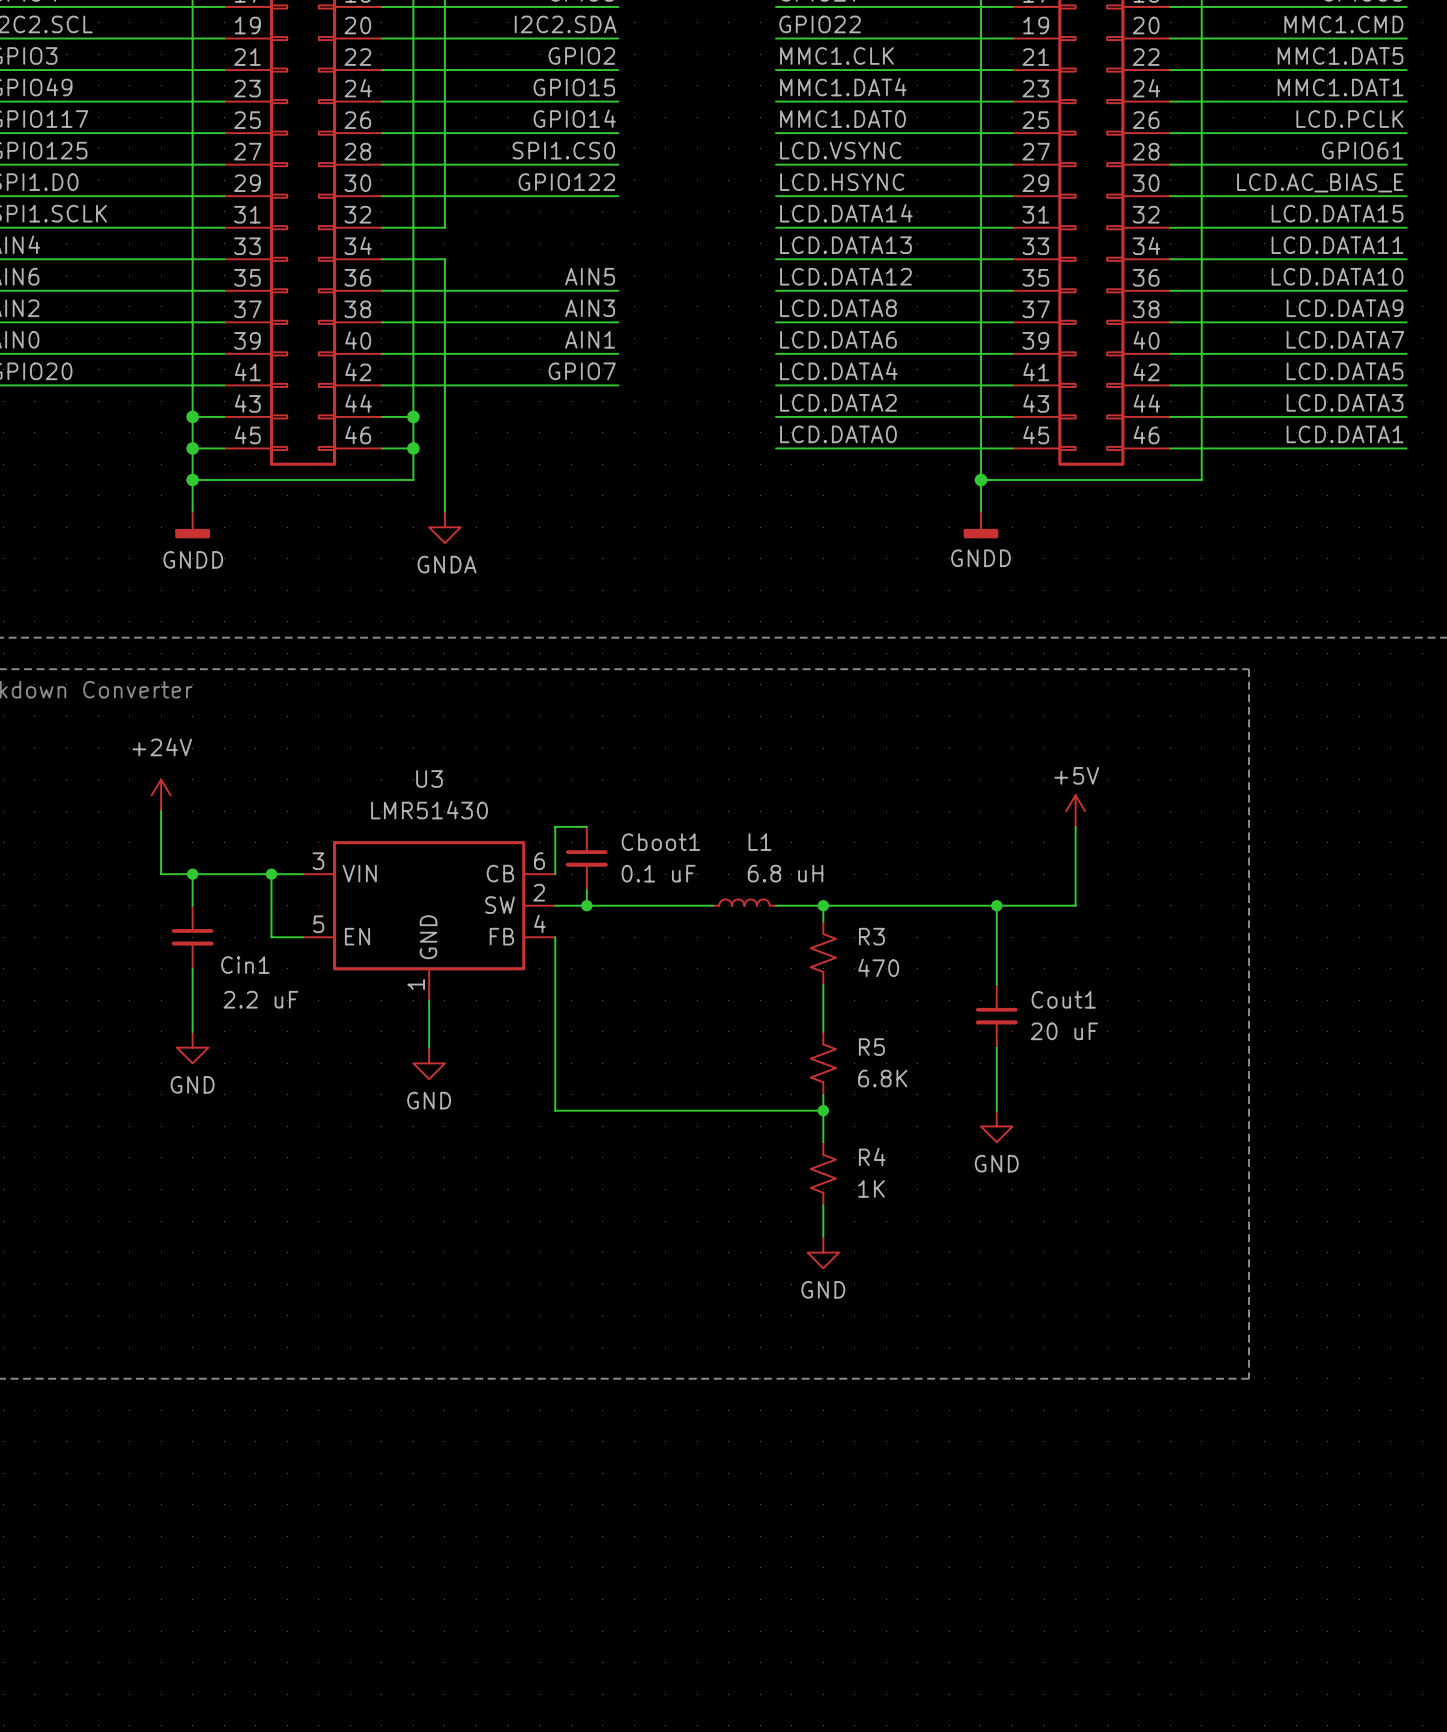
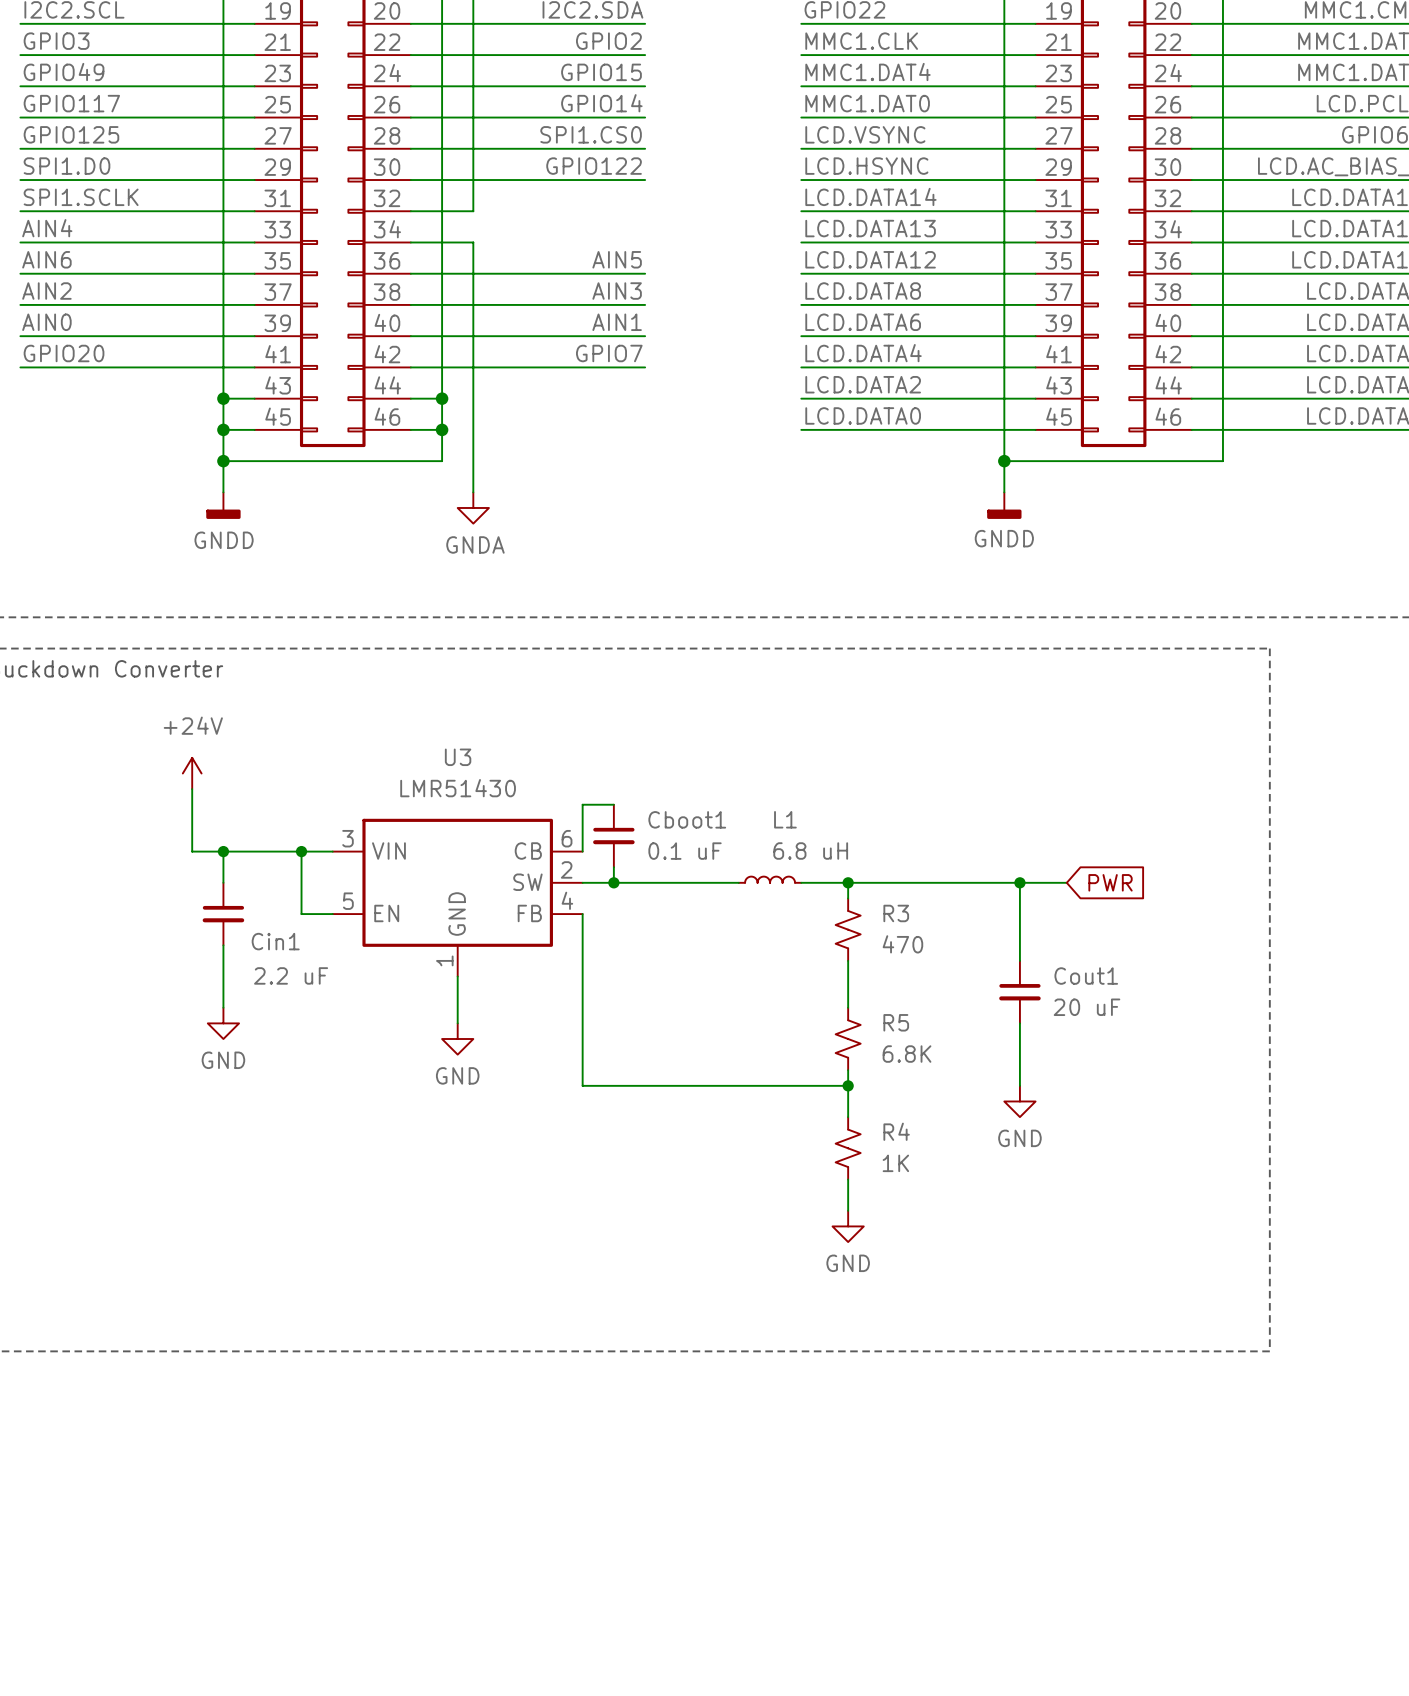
power symbol: +5V (1075, 811) -> none
wire: (1075, 826) (1075, 905) (1044, 905) -> none
global label: none -> PWR (1110, 882)

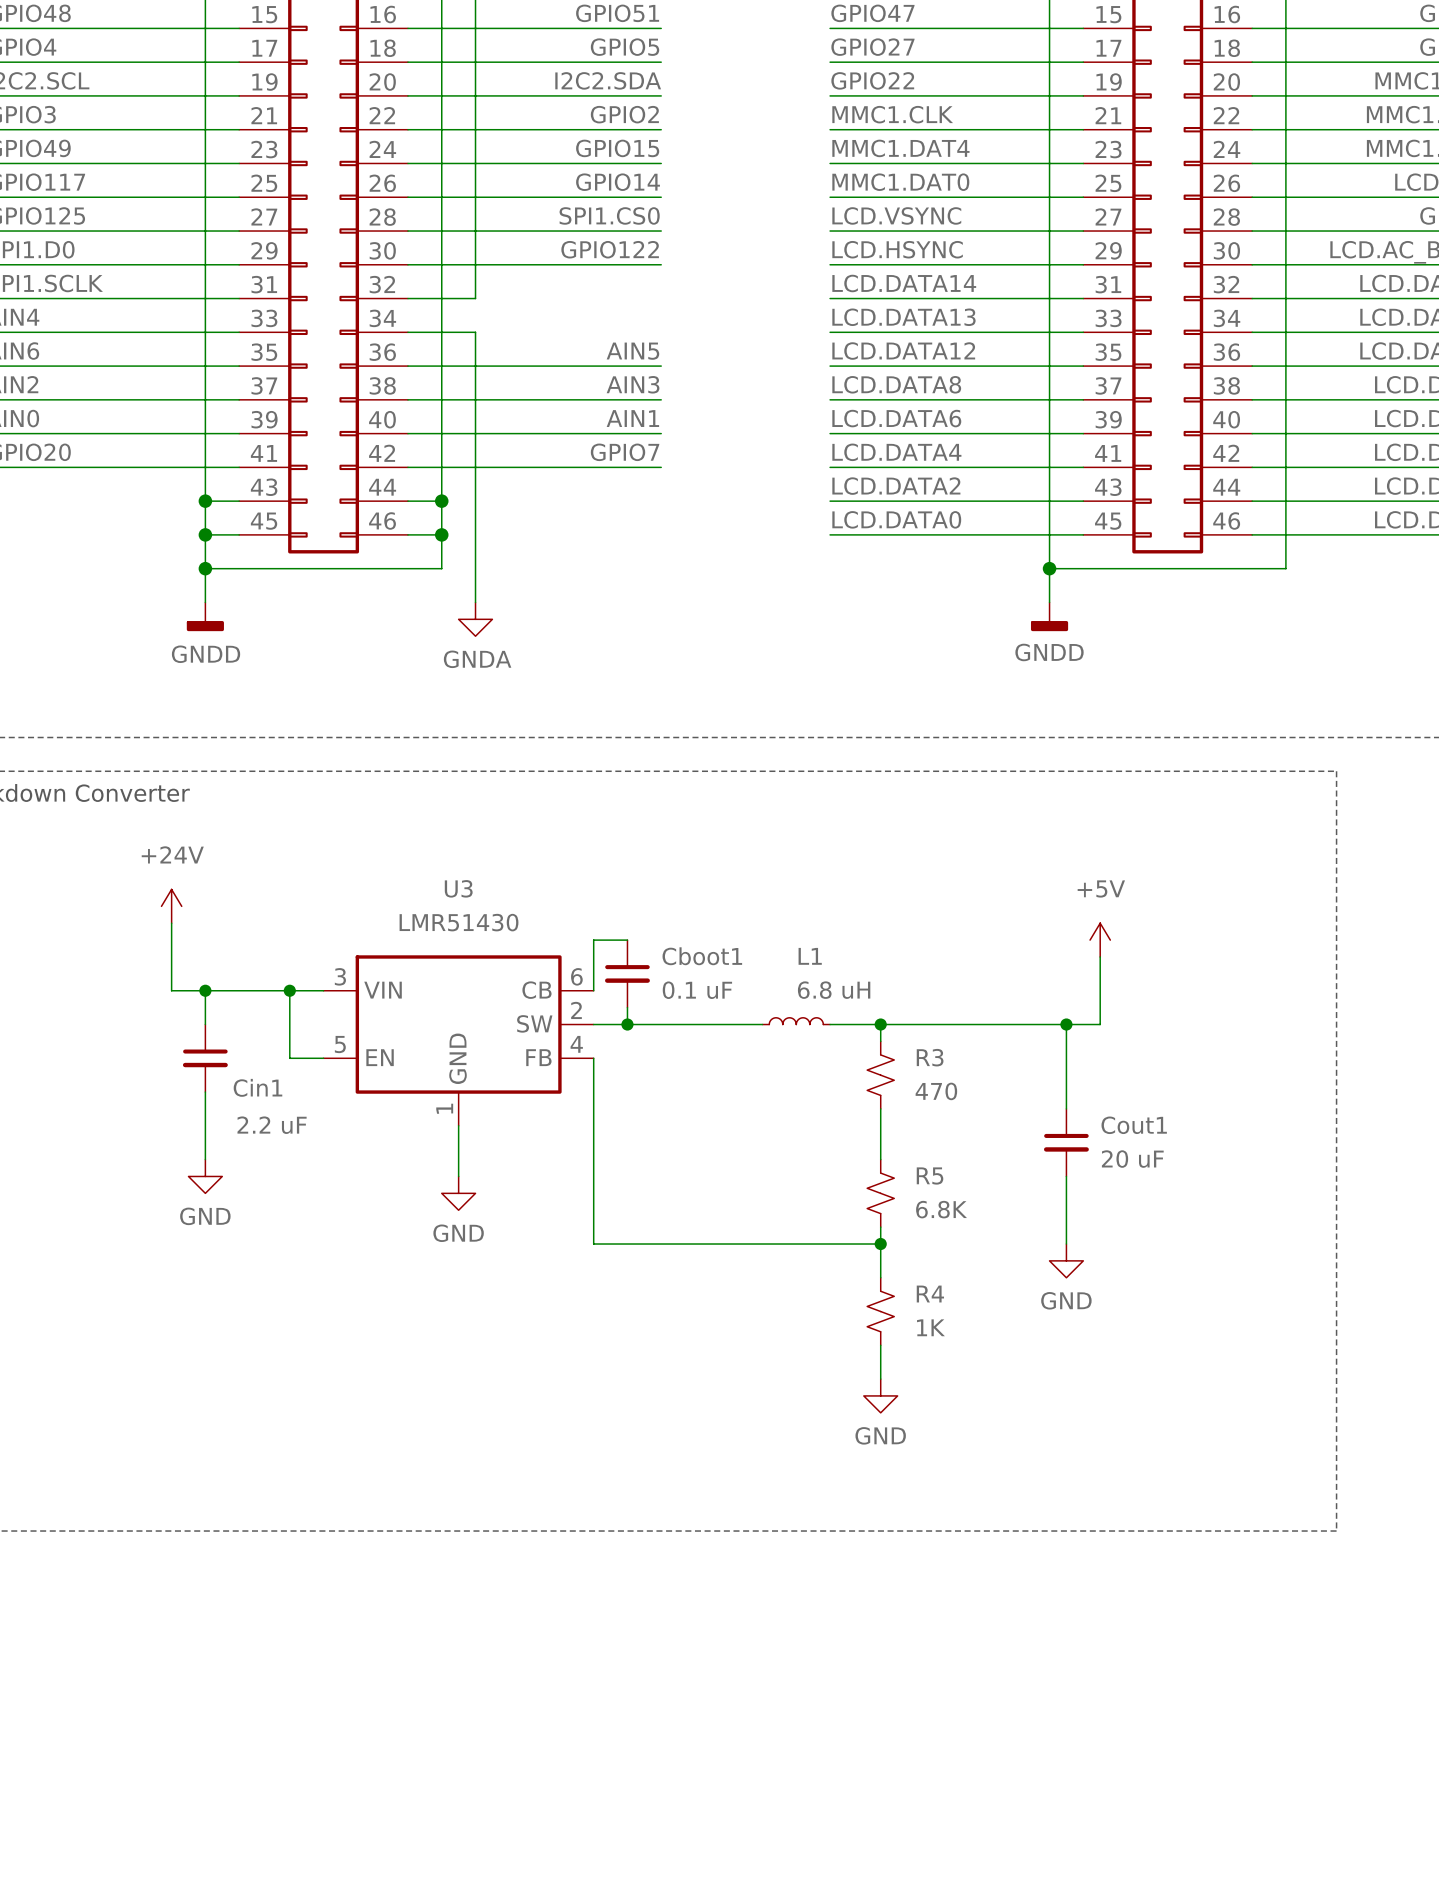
power symbol: none -> +5V (1100, 940)
wire: (1051, 882) (1066, 882) -> (1100, 1024) (1100, 956)
global label: PWR (1110, 882) -> none

